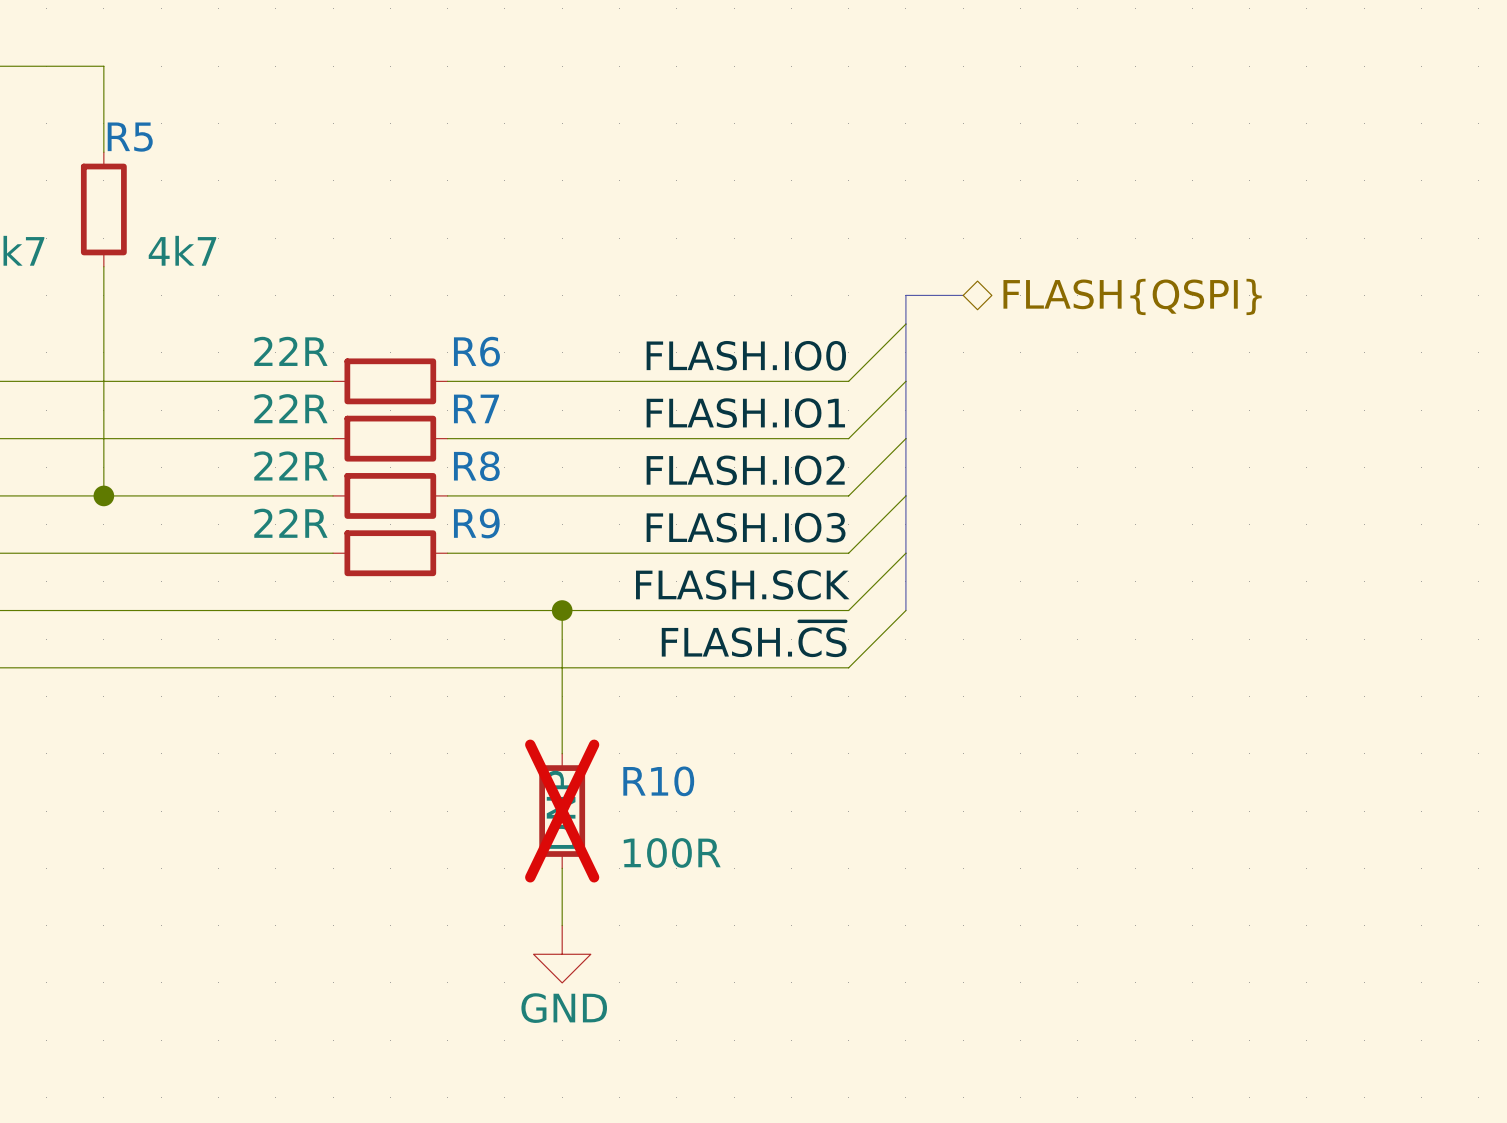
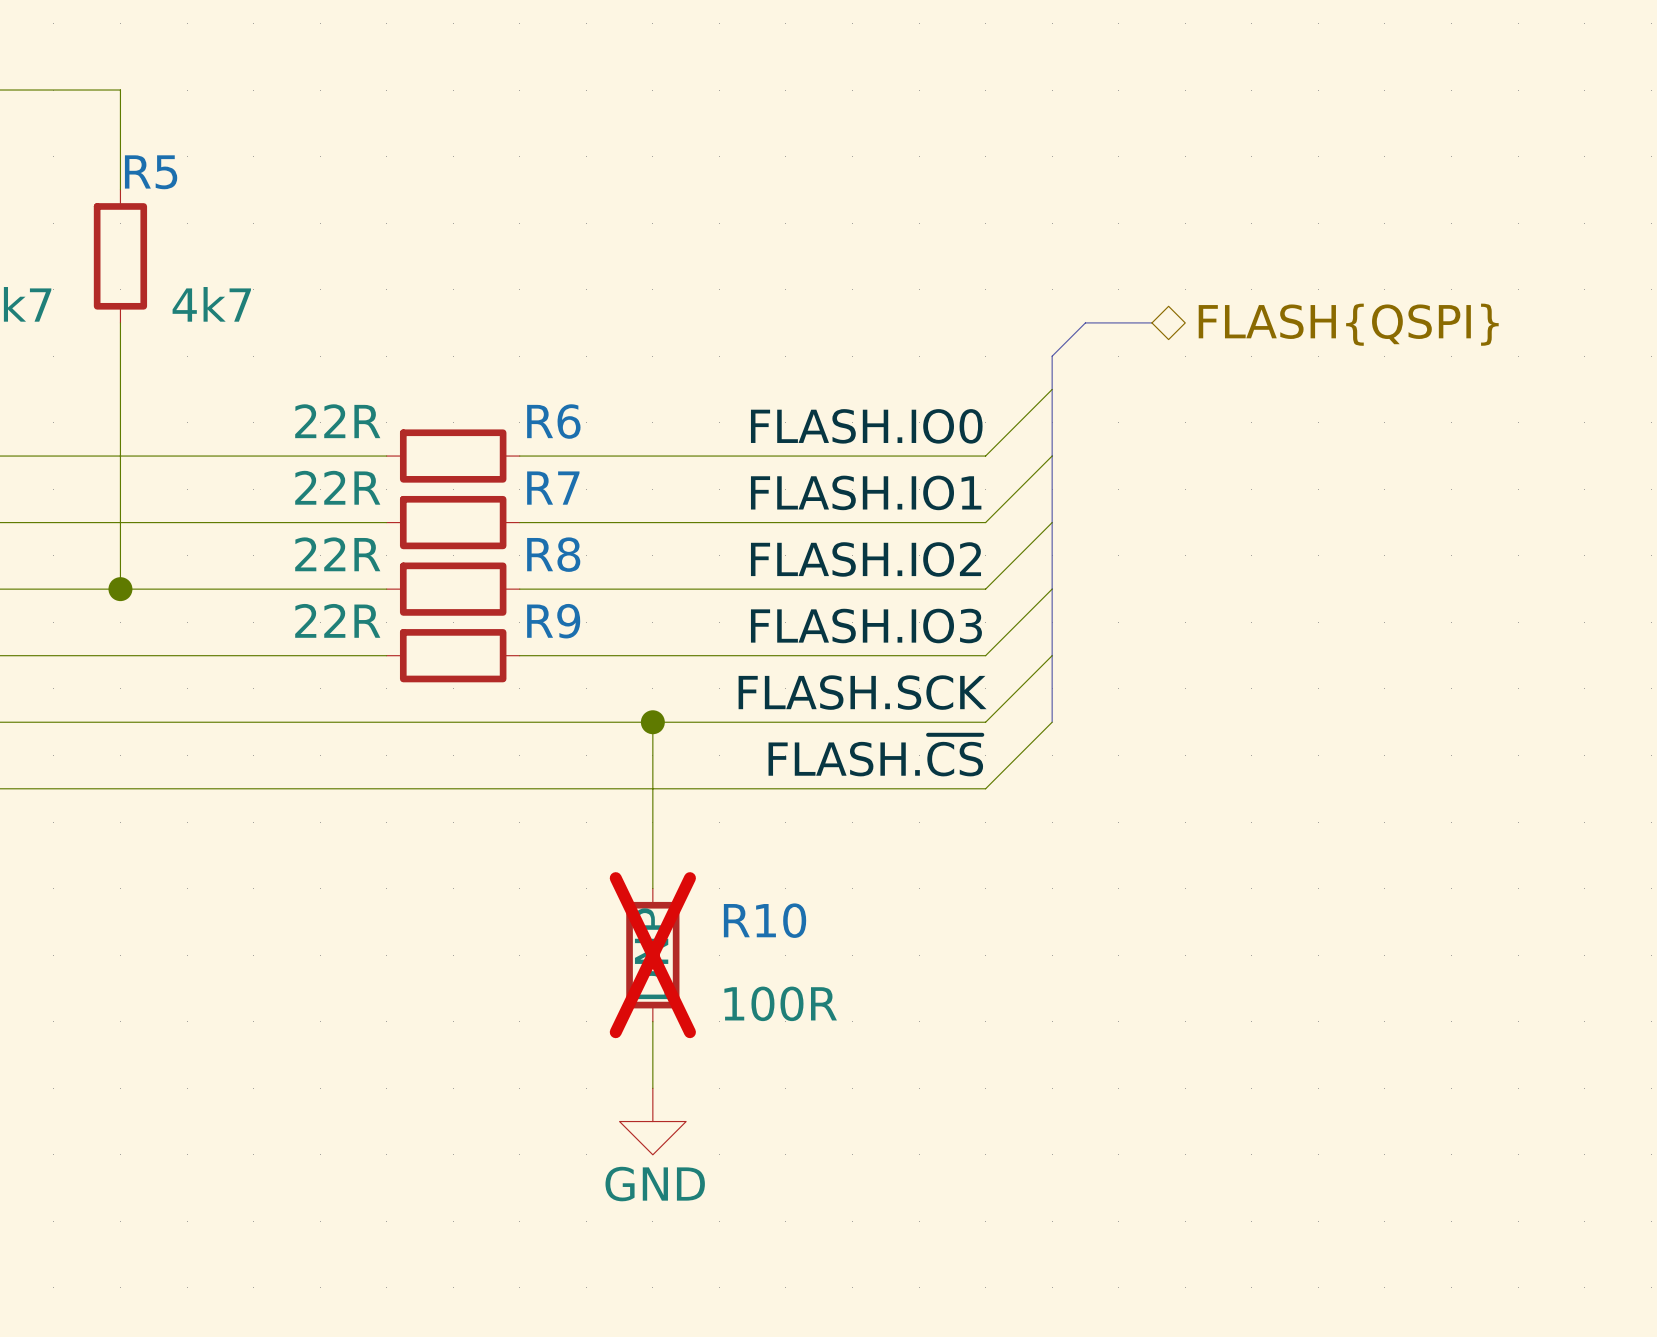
bus: (905, 295) (963, 295) -> (1052, 356) (1085, 322) (1151, 322)
hierarchical label position: FLASH{QSPI} (1132, 296) -> FLASH{QSPI} (1348, 324)

